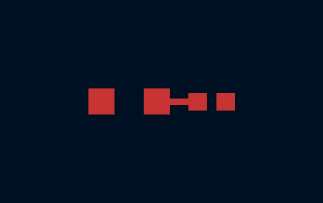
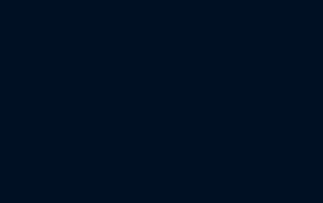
part: (129, 101) -> none
top track: (197, 101) (157, 101) -> none
part: (211, 101) -> none

